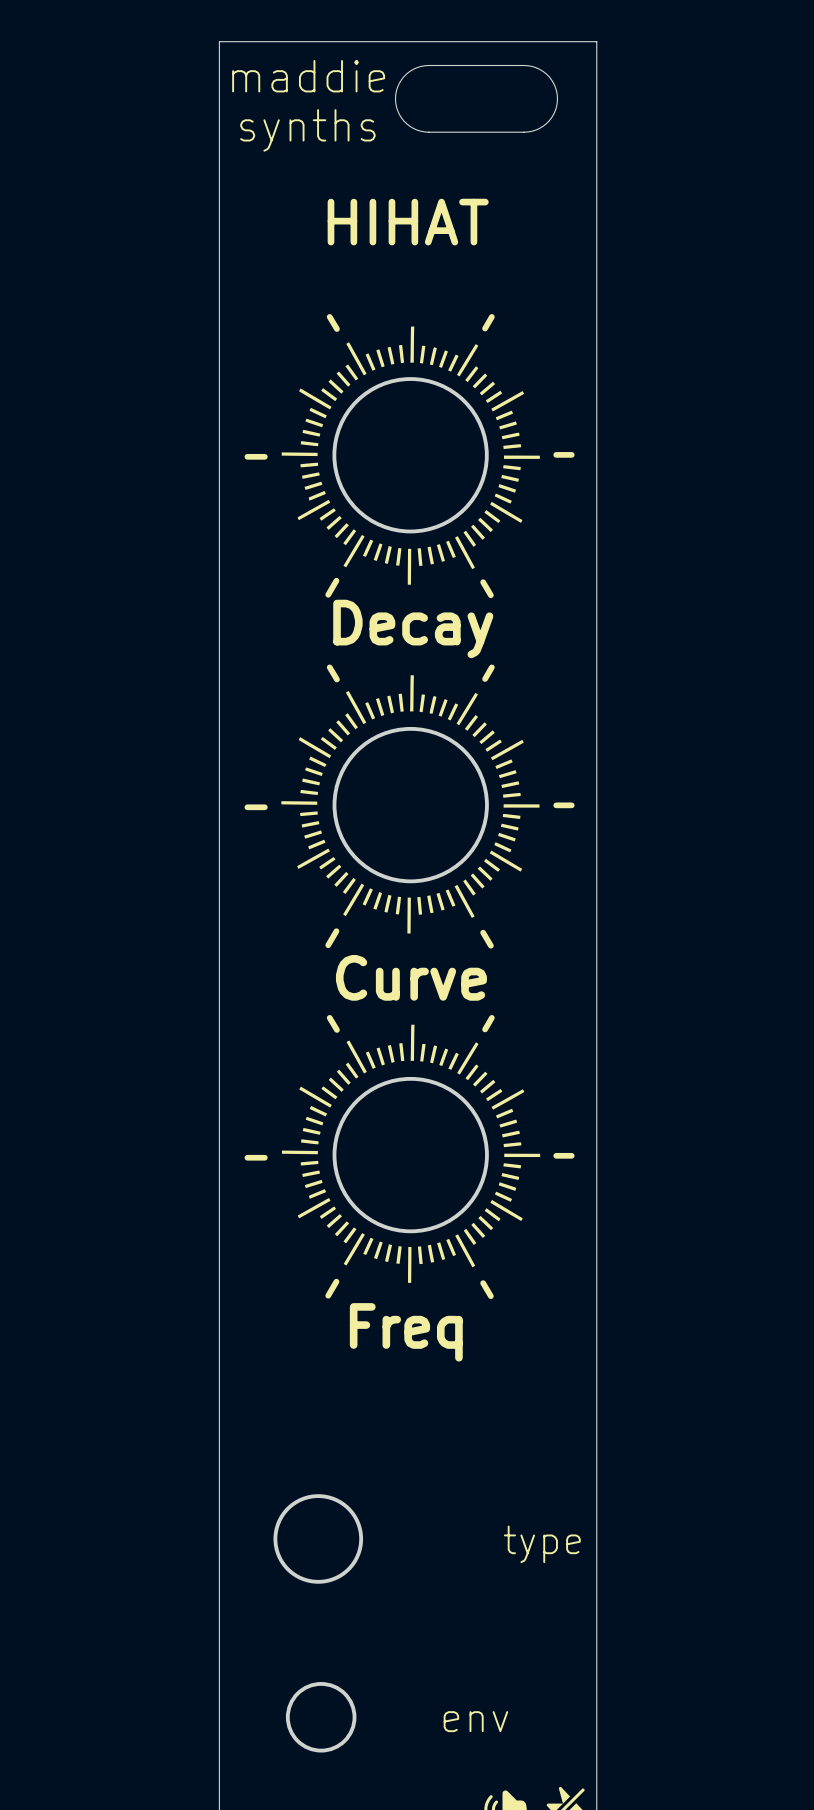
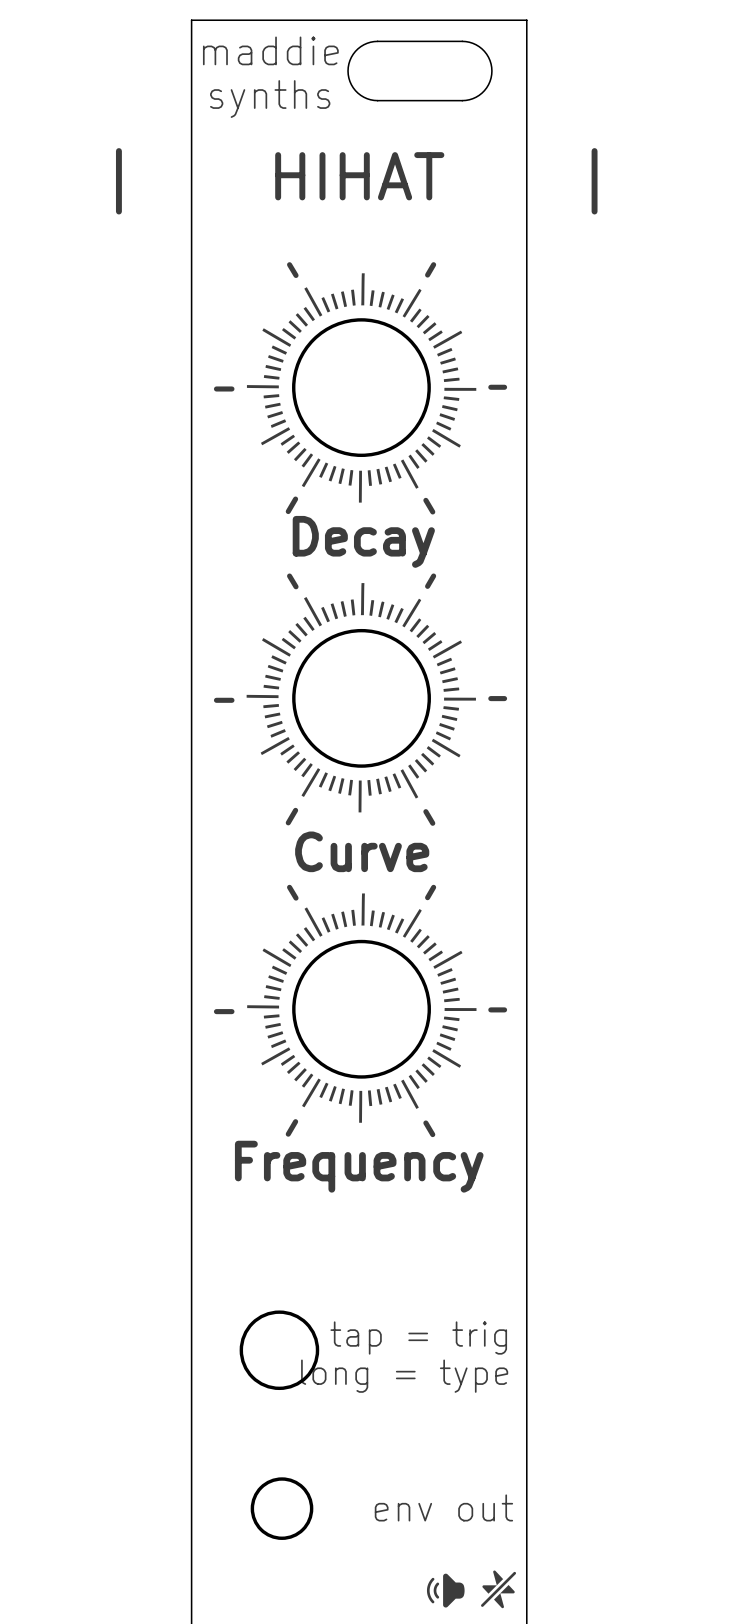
text: HIHAT (408, 222) -> | HIHAT | (356, 181)
text: Freq (406, 1332) -> Frequency (359, 1166)
text: none -> tap = trig (418, 1338)
text: type (542, 1544) -> none
text: none -> long = type (404, 1376)
text: none -> env out (443, 1507)
text: env (475, 1721) -> none

